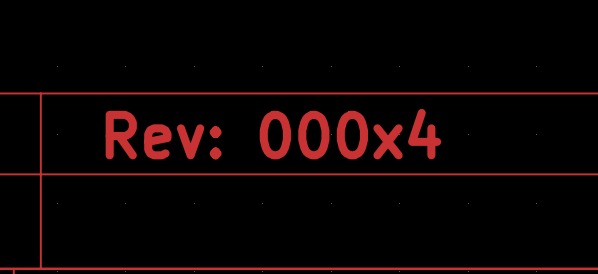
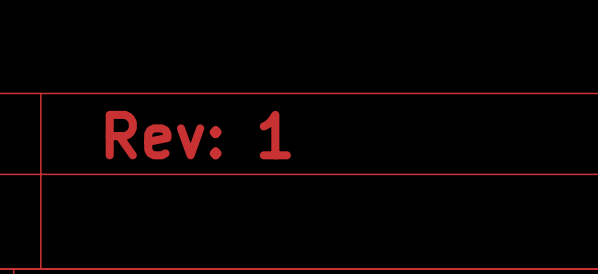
title block: Rev: 000x4 (273, 134) -> Rev: 1 (198, 135)

